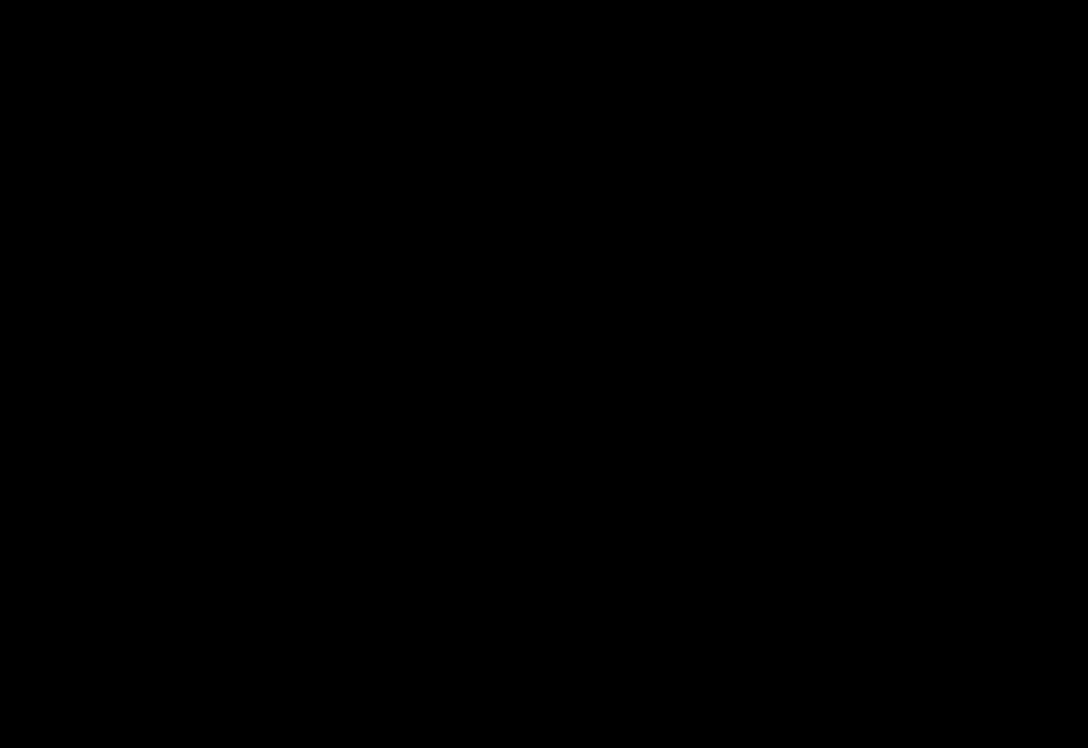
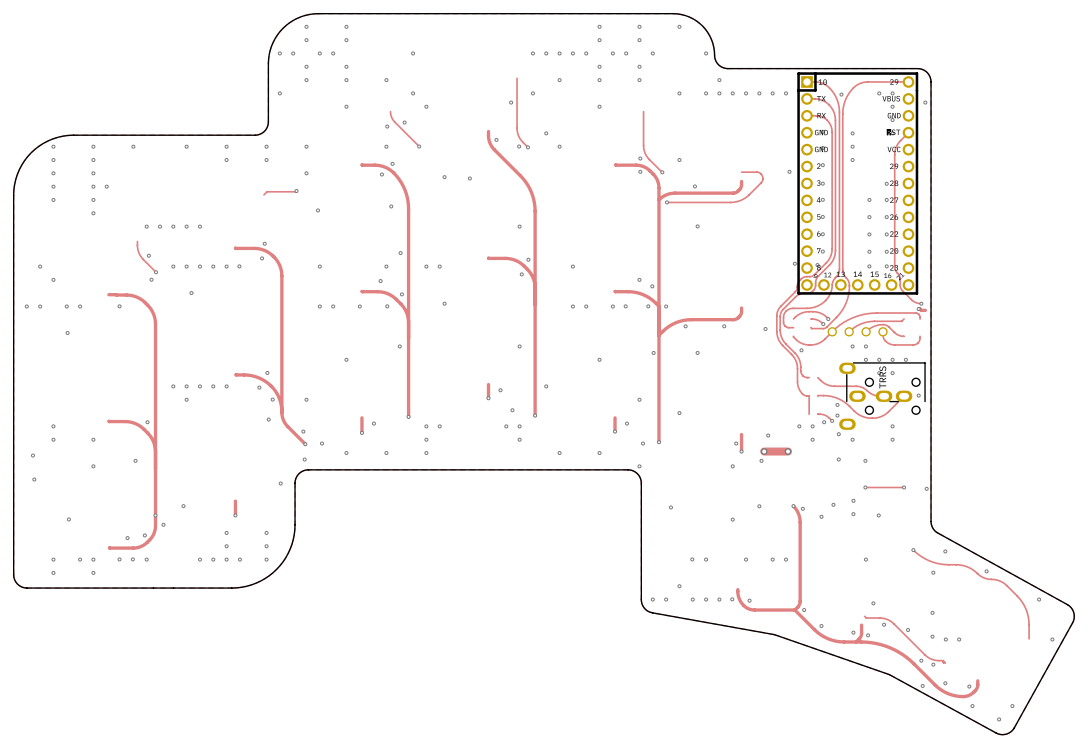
board edge: none -> (318, 13) (677, 13) (692, 18) (705, 28) (712, 43) (715, 61) (724, 68) (917, 68) (927, 72) (931, 81) (931, 524) (936, 532) (1067, 604) (1074, 614) (1072, 623) (1011, 731) (1004, 734) (997, 733) (889, 674) (774, 634) (646, 610) (641, 599) (641, 481) (637, 473) (629, 469) (305, 470) (298, 473) (295, 480) (294, 529) (290, 548) (276, 569) (255, 583) (231, 588) (26, 588) (17, 584) (13, 574) (13, 195) (15, 179) (21, 165) (31, 152) (43, 143) (68, 135) (260, 133) (266, 128) (268, 123) (268, 59) (273, 42) (280, 31) (289, 22) (301, 16) (318, 13)
via: none -> (306, 26)
via: none -> (346, 26)
via: none -> (599, 26)
via: none -> (639, 26)
via: none -> (679, 26)
via: none -> (306, 40)
via: none -> (346, 40)
via: none -> (599, 40)
via: none -> (639, 40)
via: none -> (279, 53)
via: none -> (293, 53)
via: none -> (319, 53)
via: none -> (333, 53)
via: none -> (413, 53)
via: none -> (532, 53)
via: none -> (546, 53)
via: none -> (559, 53)
via: none -> (572, 53)
via: none -> (586, 53)
via: none -> (612, 53)
via: none -> (626, 53)
via: none -> (652, 53)
via: none -> (706, 53)
via: none -> (306, 66)
via: none -> (346, 66)
via: none -> (599, 66)
via: none -> (639, 66)
track: none -> (517, 78) (517, 132) (520, 139) (527, 147)
via: none -> (306, 80)
via: none -> (346, 80)
via: none -> (386, 80)
via: none -> (559, 80)
via: none -> (599, 80)
via: none -> (639, 80)
via: none -> (719, 80)
track: none -> (807, 81) (819, 82) (826, 85) (833, 93) (838, 105) (839, 269) (832, 282) (830, 293) (823, 302) (812, 307) (791, 308) (785, 311) (784, 324) (787, 327) (793, 327)
track: none -> (908, 81) (861, 82) (853, 87) (845, 99) (842, 113) (842, 269) (849, 282) (848, 294) (841, 310) (826, 327) (810, 327)
via: none -> (279, 93)
via: none -> (413, 93)
via: none -> (532, 93)
via: none -> (679, 93)
via: none -> (706, 93)
via: none -> (719, 93)
via: none -> (732, 93)
via: none -> (746, 93)
via: none -> (759, 93)
via: none -> (772, 93)
via: none -> (786, 93)
via: none -> (879, 93)
via: none -> (892, 93)
via: none -> (841, 94)
track: none -> (807, 98) (824, 101) (831, 108) (835, 116) (835, 252) (832, 261) (816, 278) (813, 290) (797, 295) (781, 310) (780, 330) (782, 340) (798, 357) (801, 374) (809, 377)
via: none -> (511, 102)
via: none -> (925, 102)
via: none -> (346, 106)
via: none -> (426, 106)
via: none -> (599, 106)
via: none -> (892, 106)
track: none -> (390, 111) (393, 120) (419, 146)
track: none -> (643, 111) (644, 151) (648, 158) (662, 172)
track: none -> (807, 115) (823, 117) (829, 122) (831, 128) (832, 250) (826, 262) (813, 275) (801, 279) (795, 291) (779, 308) (776, 314) (776, 331) (779, 341) (795, 360) (798, 388) (803, 394) (809, 395) (809, 414)
via: none -> (892, 120)
via: none -> (404, 122)
via: none -> (387, 126)
track: none -> (488, 131) (491, 146) (525, 181) (534, 203) (535, 415)
via: none -> (822, 131)
track: none -> (908, 132) (898, 143) (894, 152) (894, 267) (899, 277) (901, 289) (912, 300) (921, 303)
via: none -> (546, 133)
via: none -> (852, 133)
via: none -> (892, 133)
via: none -> (496, 139)
via: none -> (53, 146)
via: none -> (93, 146)
via: none -> (133, 146)
via: none -> (186, 146)
via: none -> (226, 146)
via: none -> (266, 146)
via: none -> (306, 146)
via: none -> (386, 146)
via: none -> (419, 146)
via: none -> (519, 146)
via: none -> (559, 146)
via: none -> (852, 146)
via: none -> (527, 147)
via: none -> (822, 148)
via: none -> (640, 158)
via: none -> (53, 160)
via: none -> (93, 160)
via: none -> (226, 160)
via: none -> (266, 160)
via: none -> (679, 160)
via: none -> (852, 160)
via: none -> (392, 163)
track: none -> (361, 164) (380, 165) (391, 171) (403, 185) (407, 200) (408, 416)
track: none -> (615, 164) (643, 166) (654, 175) (658, 184) (658, 442)
via: none -> (822, 165)
via: none -> (640, 171)
via: none -> (789, 171)
via: none -> (662, 172)
track: none -> (741, 172) (758, 172) (762, 178) (749, 194) (740, 200) (730, 202) (667, 202)
via: none -> (53, 173)
via: none -> (93, 173)
via: none -> (306, 173)
via: none -> (381, 174)
via: none -> (444, 177)
via: none -> (469, 178)
track: none -> (741, 181) (740, 187) (735, 192) (672, 193) (658, 199)
via: none -> (822, 183)
part: none -> (857, 183)
via: none -> (886, 183)
via: none -> (53, 186)
via: none -> (93, 186)
via: none -> (106, 186)
via: none -> (694, 186)
track: none -> (296, 191) (267, 191) (263, 194)
via: none -> (296, 191)
via: none -> (53, 199)
via: none -> (93, 199)
via: none -> (822, 199)
via: none -> (869, 199)
via: none -> (886, 199)
via: none -> (666, 202)
via: none -> (391, 206)
via: none -> (318, 210)
via: none -> (93, 213)
via: none -> (822, 216)
via: none -> (869, 217)
via: none -> (886, 217)
via: none -> (146, 226)
via: none -> (160, 226)
via: none -> (173, 226)
via: none -> (186, 226)
via: none -> (199, 226)
via: none -> (519, 226)
via: none -> (697, 226)
via: none -> (822, 234)
via: none -> (869, 234)
via: none -> (886, 234)
track: none -> (137, 241) (140, 256) (156, 272)
via: none -> (264, 243)
track: none -> (235, 248) (264, 250) (274, 257) (280, 268) (281, 412)
via: none -> (822, 251)
via: none -> (869, 251)
via: none -> (886, 251)
via: none -> (400, 253)
via: none -> (148, 255)
via: none -> (262, 258)
track: none -> (488, 258) (510, 258) (520, 262) (531, 275) (535, 288)
via: none -> (528, 259)
via: none -> (794, 263)
via: none -> (817, 265)
via: none -> (40, 266)
via: none -> (173, 266)
via: none -> (186, 266)
via: none -> (199, 266)
via: none -> (213, 266)
via: none -> (226, 266)
via: none -> (239, 266)
via: none -> (319, 266)
via: none -> (386, 266)
via: none -> (426, 266)
via: none -> (439, 266)
via: none -> (572, 266)
via: none -> (869, 266)
via: none -> (886, 266)
via: none -> (156, 272)
via: none -> (521, 274)
via: none -> (53, 279)
via: none -> (151, 279)
via: none -> (639, 279)
via: none -> (380, 281)
via: none -> (652, 286)
track: none -> (361, 291) (382, 292) (392, 296) (404, 307) (408, 322)
track: none -> (615, 291) (639, 293) (649, 298) (658, 306)
via: none -> (191, 293)
track: none -> (108, 294) (131, 295) (141, 299) (152, 311) (155, 324) (155, 529) (150, 538) (140, 546) (109, 547)
via: none -> (401, 294)
via: none -> (444, 303)
via: none -> (921, 303)
via: none -> (26, 306)
via: none -> (40, 306)
via: none -> (66, 306)
via: none -> (80, 306)
via: none -> (119, 306)
via: none -> (319, 306)
via: none -> (333, 306)
via: none -> (359, 306)
via: none -> (387, 306)
via: none -> (572, 306)
via: none -> (586, 306)
via: none -> (612, 306)
via: none -> (625, 306)
via: none -> (648, 306)
via: none -> (666, 306)
track: none -> (741, 308) (740, 314) (735, 319) (683, 320) (668, 326) (658, 335)
track: none -> (918, 309) (925, 310)
via: none -> (918, 309)
track: none -> (793, 319) (801, 313) (812, 311) (822, 313) (828, 319)
track: none -> (810, 319) (817, 319) (823, 324)
via: none -> (828, 319)
track: none -> (904, 319) (901, 321) (867, 321) (857, 325) (849, 331)
track: none -> (920, 319) (919, 315) (916, 313) (867, 313) (843, 322) (816, 344) (803, 344) (793, 336)
via: none -> (823, 324)
via: none -> (685, 326)
via: none -> (724, 326)
via: none -> (765, 328)
part: none -> (857, 331)
track: none -> (866, 331) (873, 326) (884, 324) (897, 334) (904, 336)
track: none -> (883, 331) (884, 340) (893, 344) (915, 344) (919, 341) (920, 336)
via: none -> (67, 332)
via: none -> (399, 346)
via: none -> (519, 346)
via: none -> (852, 346)
via: none -> (865, 346)
via: none -> (801, 350)
via: none -> (653, 352)
via: none -> (697, 352)
via: none -> (346, 359)
via: none -> (599, 359)
via: none -> (865, 359)
via: none -> (879, 359)
via: none -> (892, 359)
via: none -> (905, 359)
via: none -> (267, 372)
via: none -> (879, 373)
via: none -> (892, 373)
track: none -> (235, 374) (255, 376) (268, 383) (279, 397) (281, 412)
track: none -> (817, 377) (828, 385) (858, 386) (873, 394) (884, 396)
track: none -> (488, 384) (488, 398)
via: none -> (173, 386)
via: none -> (186, 386)
via: none -> (199, 386)
via: none -> (213, 386)
via: none -> (226, 386)
via: none -> (546, 386)
via: none -> (259, 387)
via: none -> (500, 390)
track: none -> (817, 395) (837, 398) (860, 415) (871, 418) (885, 414) (904, 396)
via: none -> (918, 395)
part: none -> (882, 396)
via: none -> (488, 398)
via: none -> (186, 399)
via: none -> (272, 399)
via: none -> (306, 399)
via: none -> (639, 399)
via: none -> (837, 404)
via: none -> (512, 410)
track: none -> (281, 412) (286, 424) (305, 444)
via: none -> (679, 413)
track: none -> (817, 414) (825, 415) (832, 420)
via: none -> (535, 415)
via: none -> (837, 415)
via: none -> (408, 416)
track: none -> (361, 417) (361, 432)
track: none -> (615, 417) (615, 431)
via: none -> (268, 419)
via: none -> (832, 420)
track: none -> (108, 421) (130, 422) (139, 426) (151, 437) (155, 451)
via: none -> (147, 422)
via: none -> (824, 422)
via: none -> (373, 423)
via: none -> (627, 423)
via: none -> (53, 426)
via: none -> (426, 426)
via: none -> (439, 426)
via: none -> (506, 426)
via: none -> (519, 426)
via: none -> (799, 426)
via: none -> (812, 426)
via: none -> (892, 426)
via: none -> (303, 431)
via: none -> (615, 431)
via: none -> (361, 432)
track: none -> (741, 434) (741, 451)
via: none -> (838, 434)
via: none -> (768, 435)
via: none -> (53, 439)
via: none -> (93, 439)
via: none -> (426, 439)
via: none -> (519, 439)
via: none -> (812, 439)
via: none -> (852, 439)
via: none -> (892, 439)
via: none -> (658, 442)
via: none -> (322, 443)
via: none -> (642, 443)
via: none -> (736, 443)
via: none -> (305, 444)
via: none -> (741, 451)
track: none -> (764, 451) (788, 451)
via: none -> (764, 451)
via: none -> (788, 451)
via: none -> (346, 453)
via: none -> (386, 453)
via: none -> (426, 453)
via: none -> (559, 453)
via: none -> (599, 453)
via: none -> (32, 455)
via: none -> (304, 459)
via: none -> (838, 459)
via: none -> (135, 460)
via: none -> (761, 460)
via: none -> (865, 460)
via: none -> (93, 466)
via: none -> (639, 466)
via: none -> (732, 466)
via: none -> (34, 479)
via: none -> (280, 483)
track: none -> (865, 487) (904, 487)
via: none -> (865, 487)
via: none -> (904, 487)
via: none -> (926, 488)
via: none -> (853, 500)
track: none -> (235, 501) (235, 515)
via: none -> (833, 504)
via: none -> (183, 506)
via: none -> (759, 506)
track: none -> (793, 506) (798, 513) (800, 522) (800, 601) (794, 610)
via: none -> (793, 506)
via: none -> (670, 507)
via: none -> (802, 508)
via: none -> (853, 514)
via: none -> (155, 515)
via: none -> (235, 515)
via: none -> (878, 515)
via: none -> (821, 516)
via: none -> (68, 519)
via: none -> (732, 519)
via: none -> (163, 524)
via: none -> (226, 532)
via: none -> (266, 532)
via: none -> (144, 535)
via: none -> (127, 538)
via: none -> (226, 546)
via: none -> (266, 546)
track: none -> (913, 550) (929, 560) (940, 564) (964, 566) (983, 577) (997, 580) (1005, 584) (1019, 598) (1025, 609) (1028, 620) (1029, 638)
via: none -> (913, 550)
via: none -> (945, 551)
via: none -> (53, 559)
via: none -> (80, 559)
via: none -> (93, 559)
via: none -> (119, 559)
via: none -> (132, 559)
via: none -> (146, 559)
via: none -> (199, 559)
via: none -> (213, 559)
via: none -> (226, 559)
via: none -> (239, 559)
via: none -> (266, 559)
via: none -> (692, 559)
via: none -> (706, 559)
via: none -> (746, 559)
via: none -> (772, 559)
via: none -> (786, 559)
via: none -> (865, 559)
via: none -> (986, 571)
via: none -> (53, 572)
via: none -> (93, 572)
via: none -> (933, 572)
via: none -> (679, 586)
track: none -> (737, 589) (741, 602) (750, 609) (794, 610)
via: none -> (652, 599)
via: none -> (666, 599)
via: none -> (692, 599)
via: none -> (706, 599)
via: none -> (719, 599)
via: none -> (732, 599)
via: none -> (1039, 599)
via: none -> (749, 600)
via: none -> (873, 603)
track: none -> (794, 610) (817, 632) (828, 638) (840, 641) (875, 643) (898, 651) (910, 660) (937, 687) (947, 693) (959, 696) (968, 695) (976, 688) (977, 680)
via: none -> (804, 610)
via: none -> (932, 612)
track: none -> (864, 616) (889, 620) (926, 656) (945, 662) (943, 662)
via: none -> (884, 624)
track: none -> (861, 625) (861, 635) (856, 641)
via: none -> (821, 626)
via: none -> (908, 630)
via: none -> (853, 632)
via: none -> (868, 635)
via: none -> (932, 636)
via: none -> (945, 639)
via: none -> (959, 639)
via: none -> (1052, 639)
via: none -> (921, 660)
via: none -> (933, 664)
via: none -> (945, 683)
via: none -> (922, 685)
via: none -> (969, 686)
via: none -> (972, 706)
via: none -> (1012, 706)
via: none -> (999, 719)

